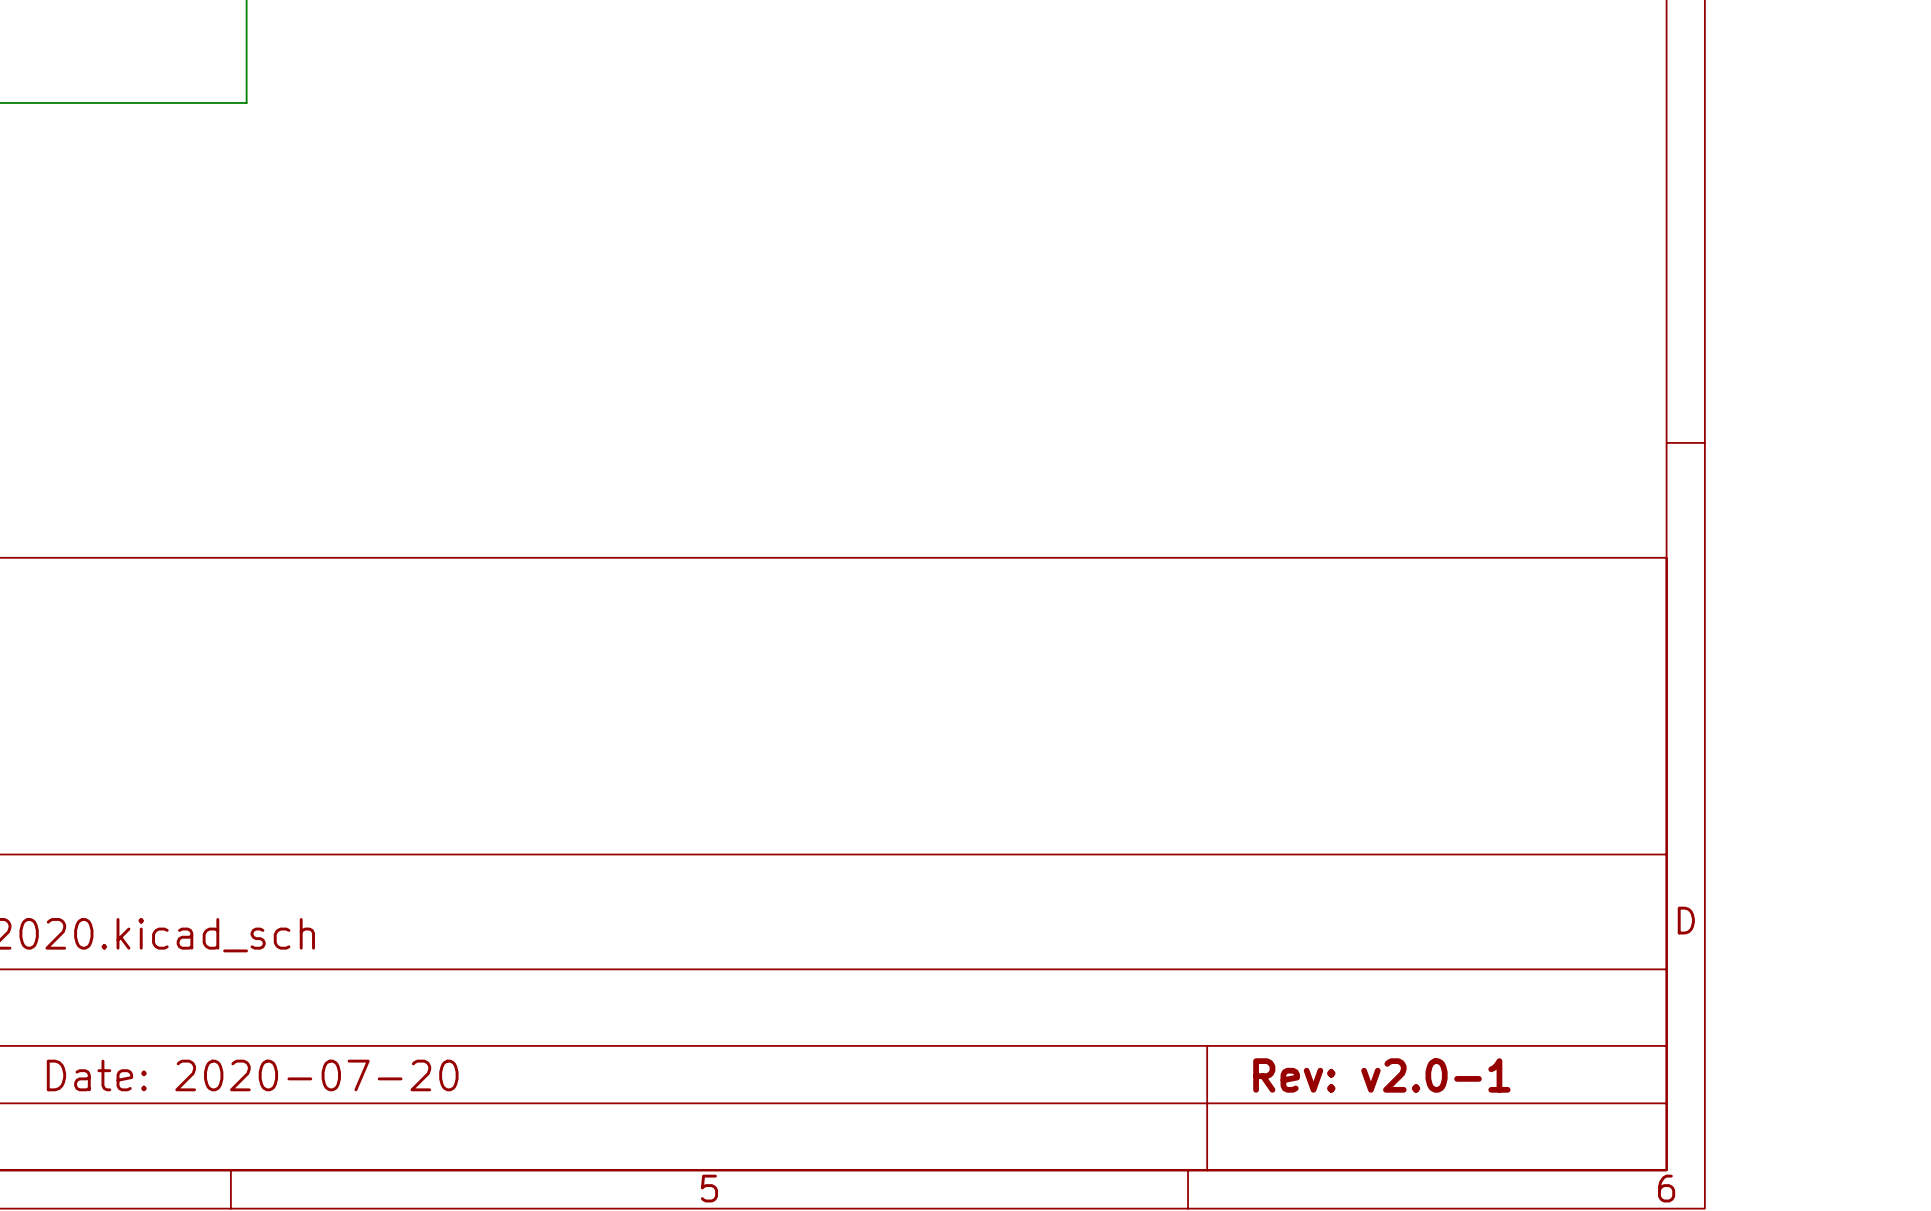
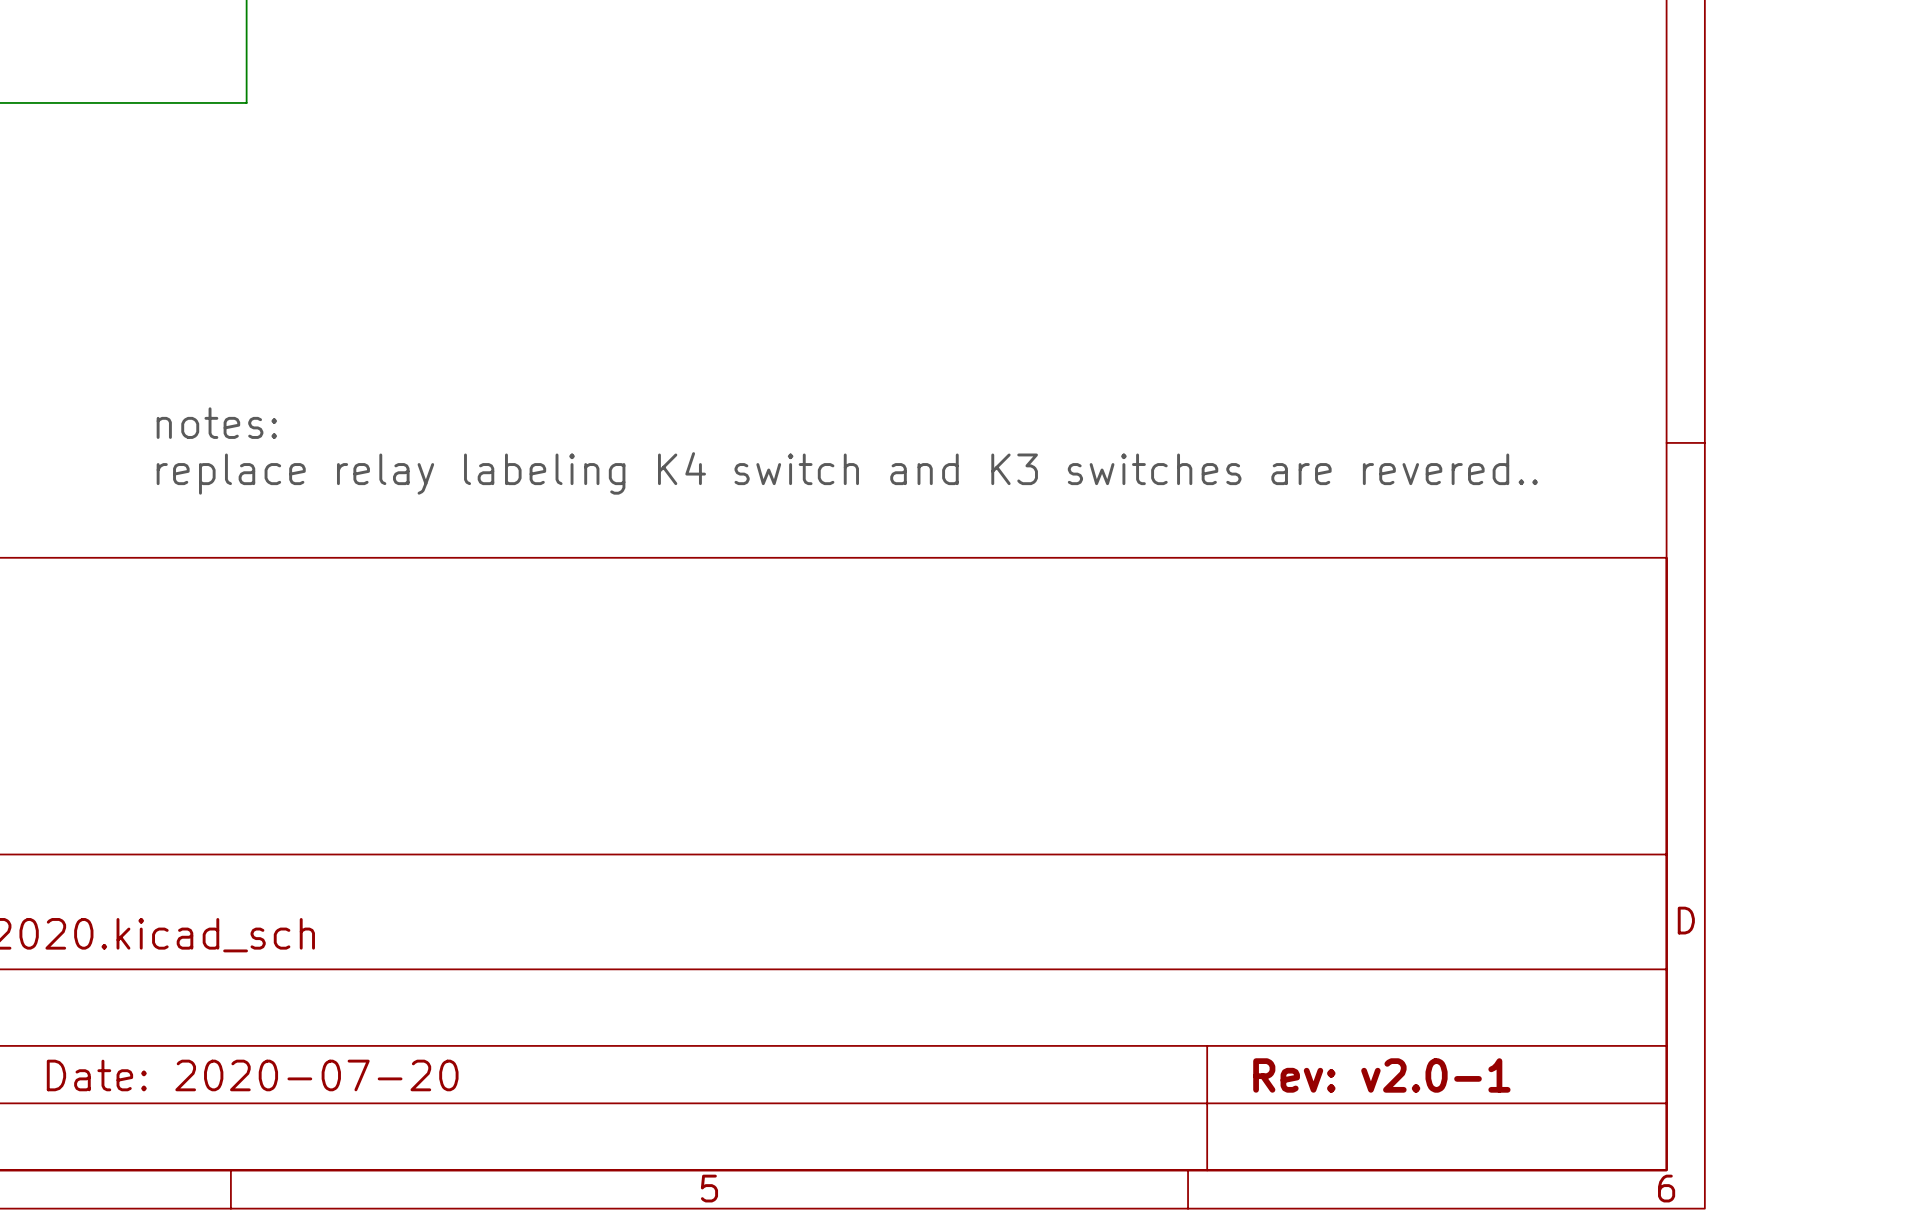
text: none -> notes: (216, 423)
text: none -> replace relay labeling K4 switch and K3 switches are revered.. (847, 473)

